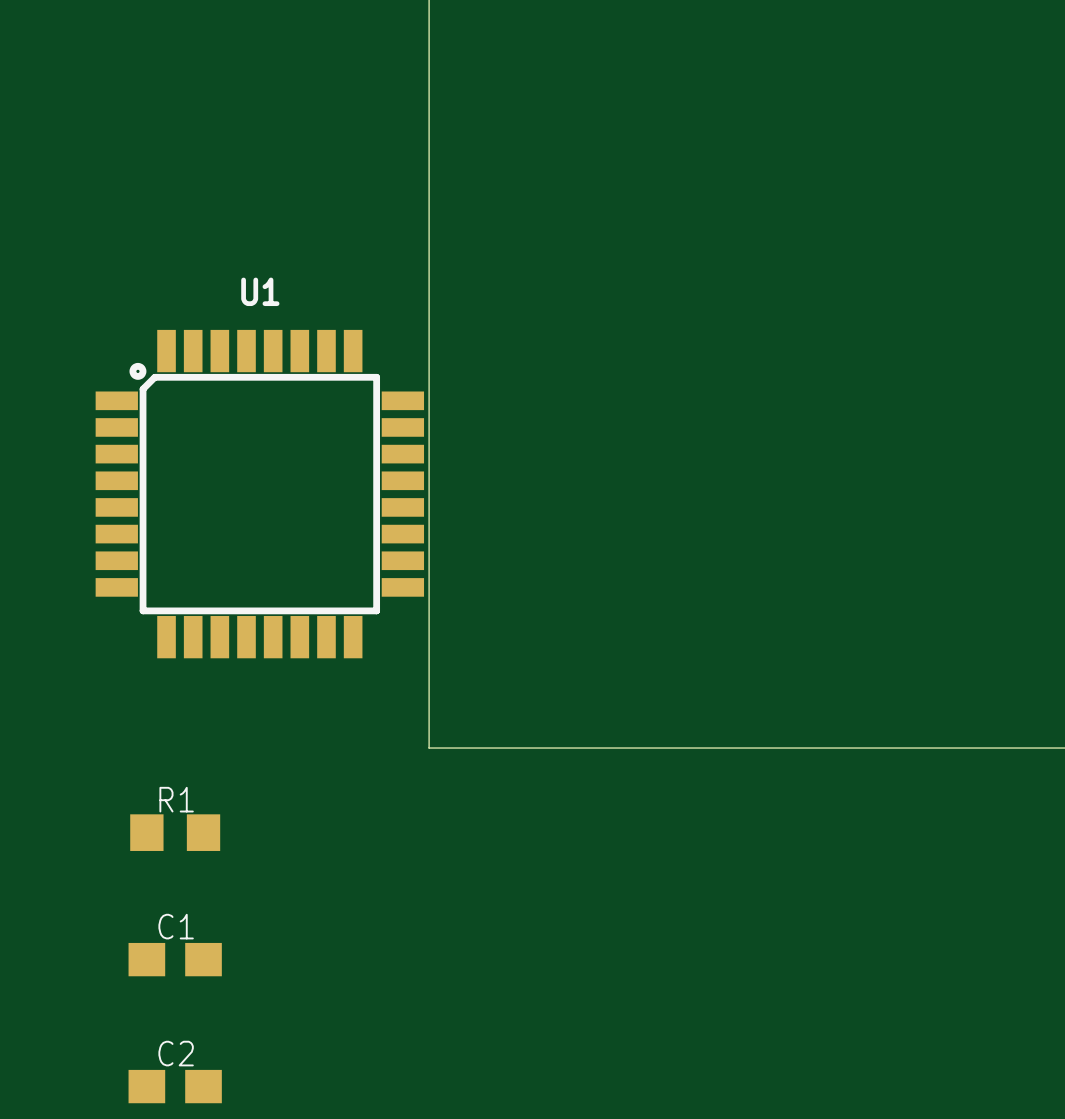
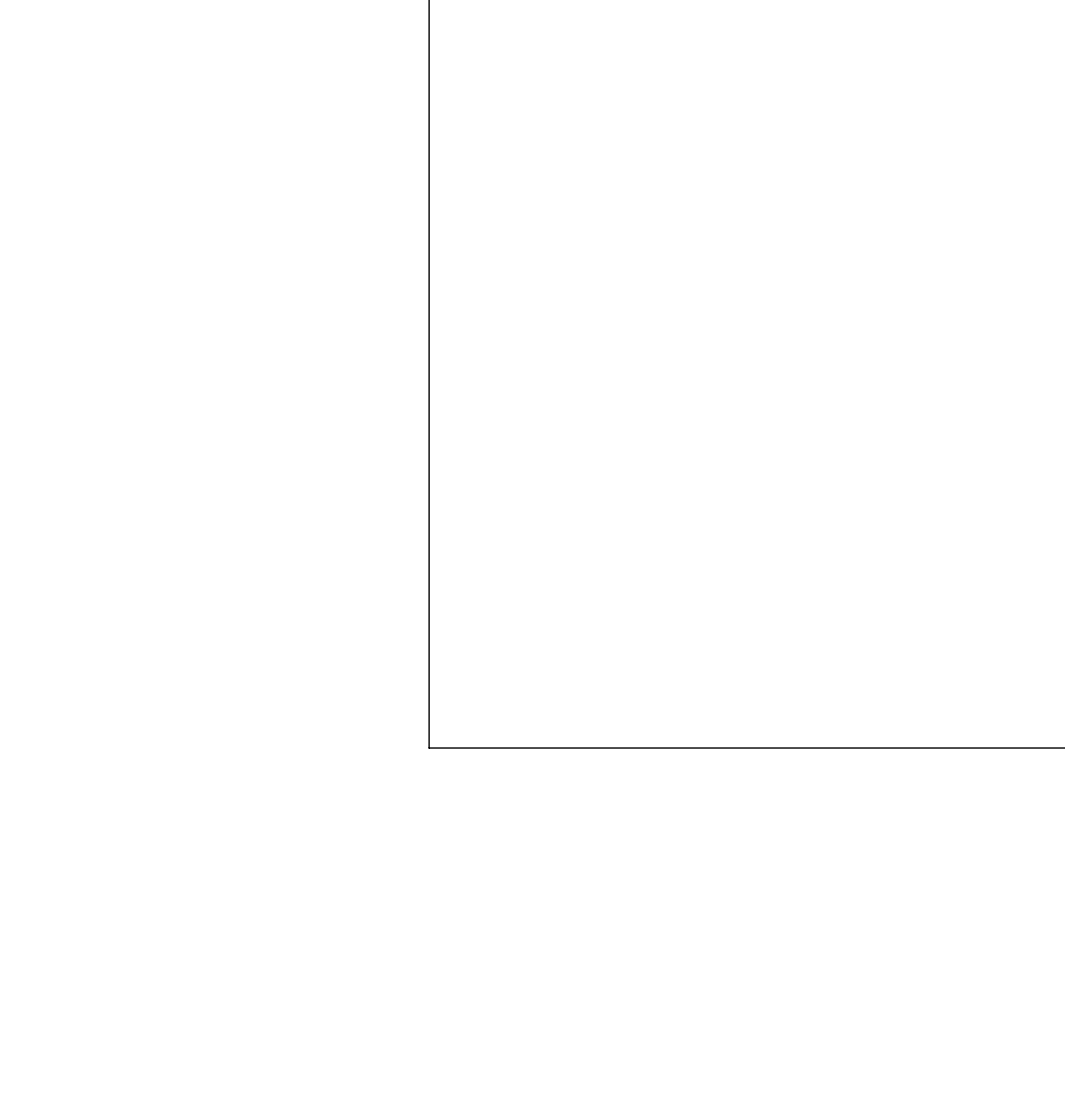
U1: (259, 494) -> none
R1: (175, 832) -> none
C1: (175, 959) -> none
C2: (175, 1086) -> none

